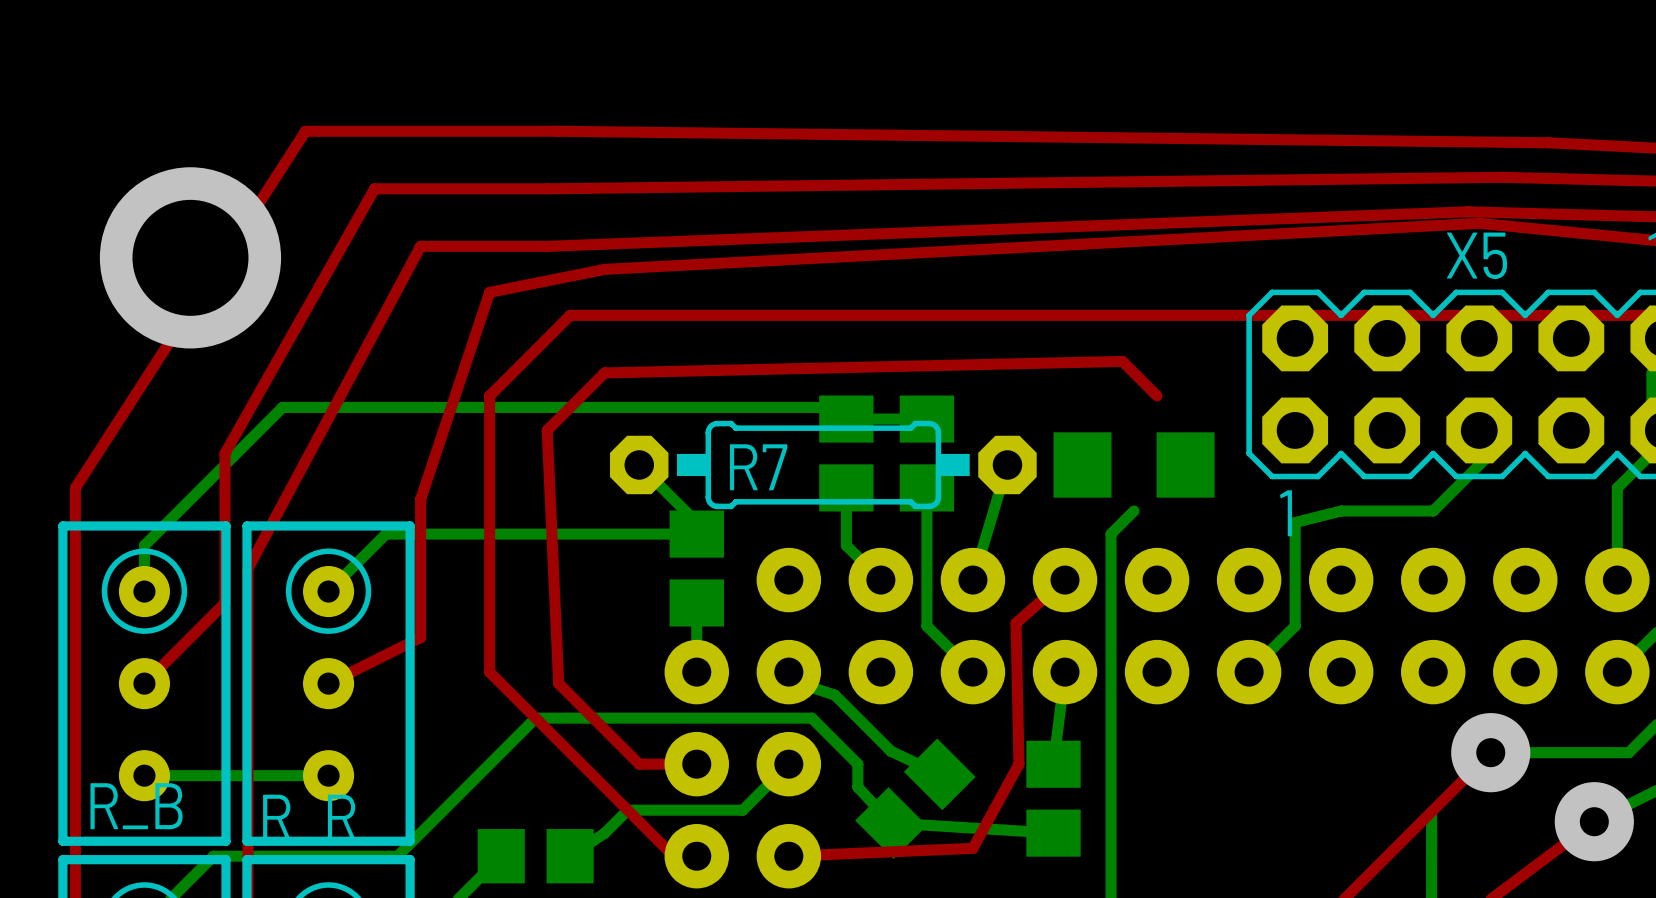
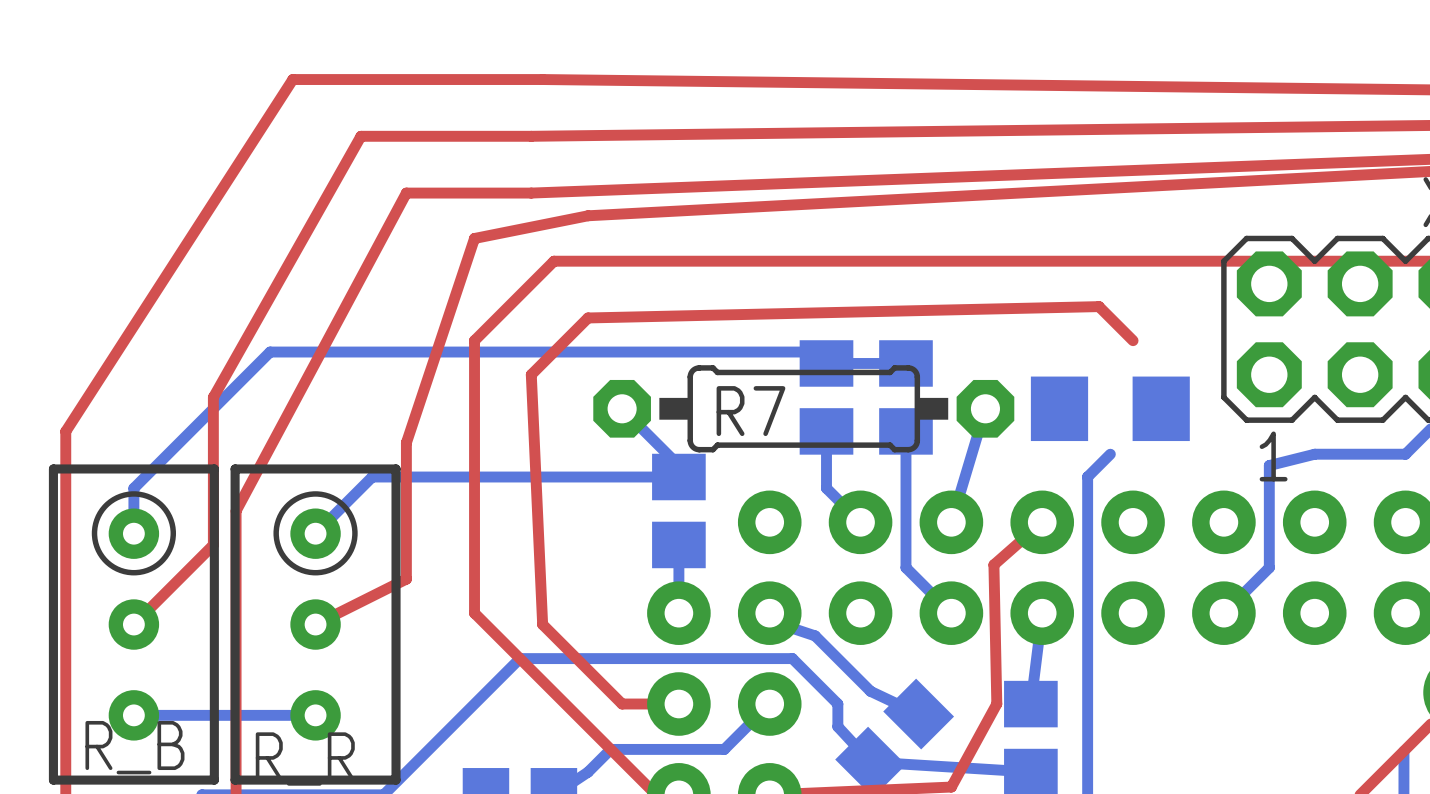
via: (190, 257) -> none

